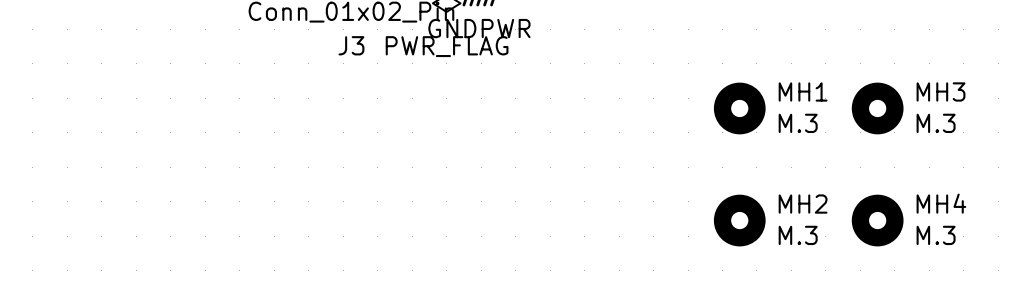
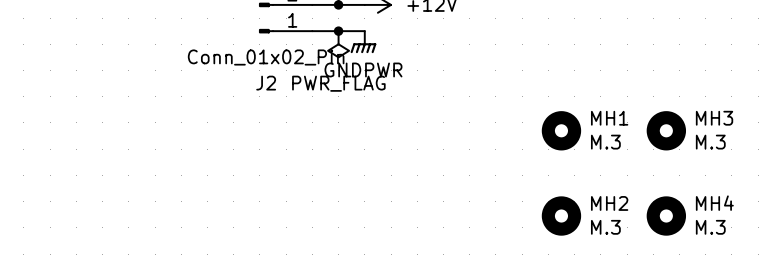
J3 name: J3 (351, 45) -> J2 (266, 83)

